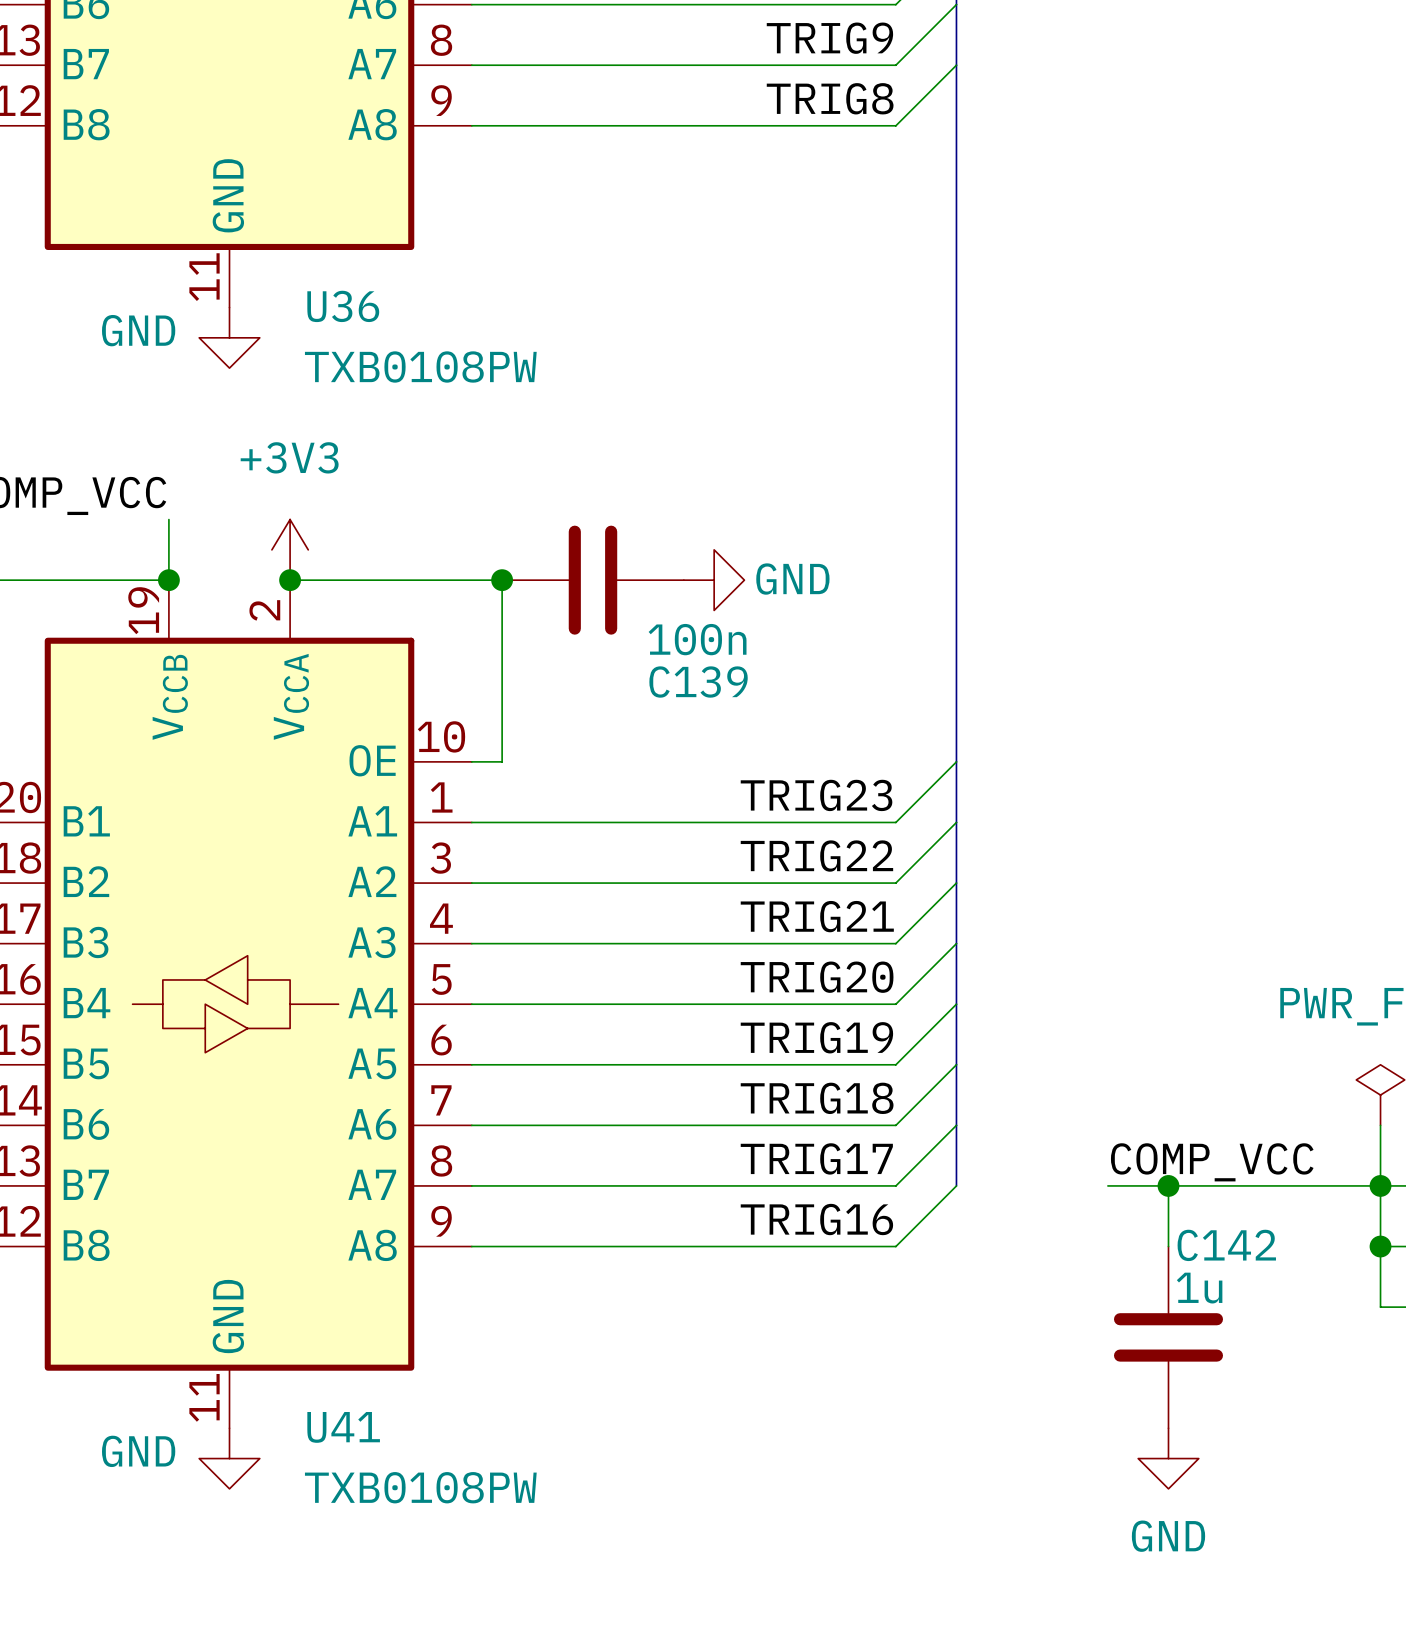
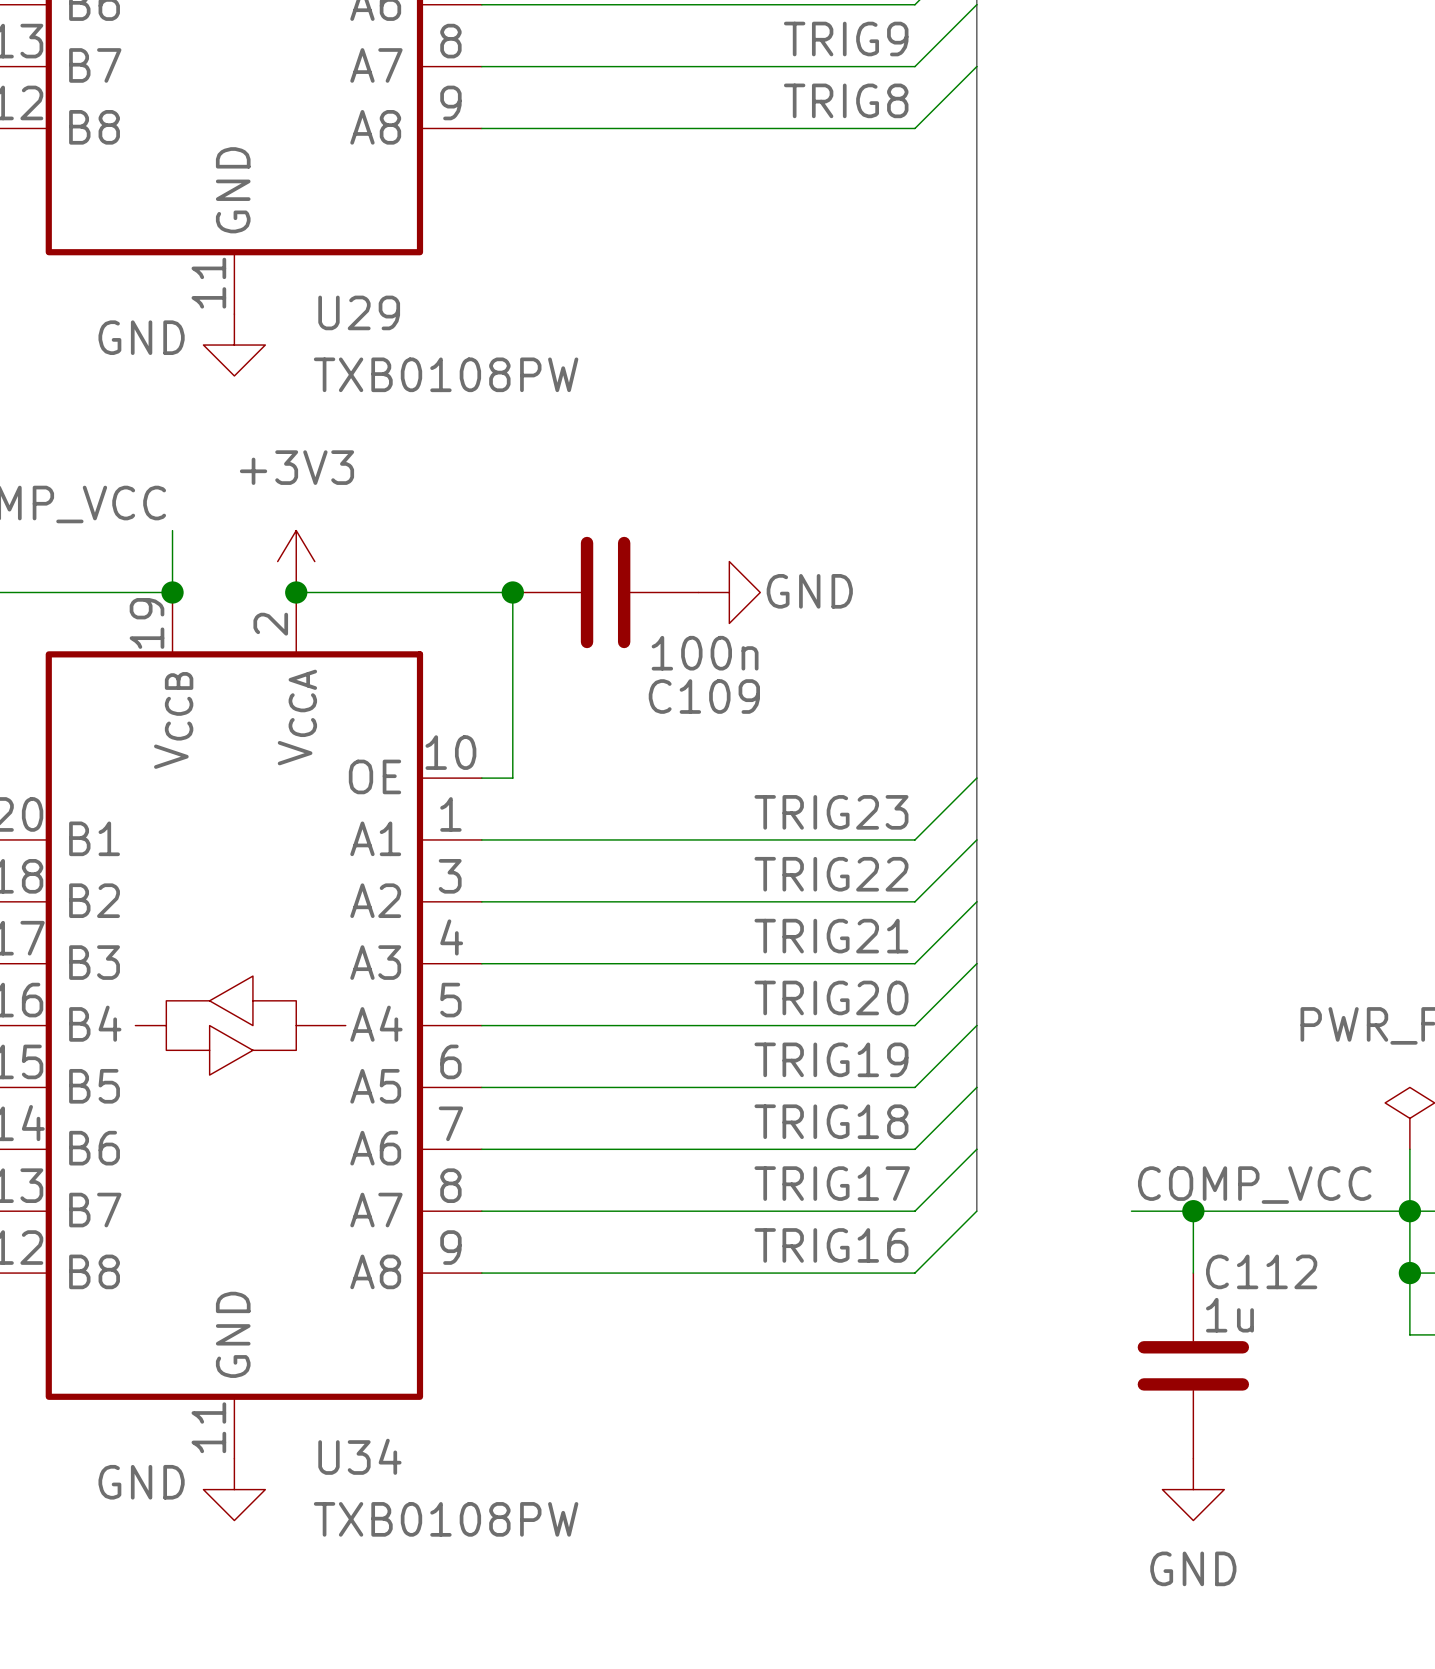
U36 name: U36 (343, 306) -> U29 (359, 312)
C139 name: C139 (698, 682) -> C109 (704, 696)
C142 name: C142 (1226, 1245) -> C112 (1261, 1271)
U41 name: U41 (343, 1427) -> U34 (359, 1456)

